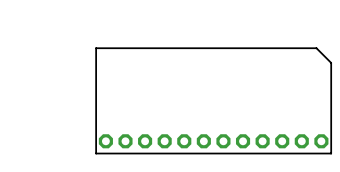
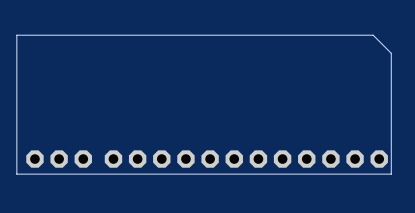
board edge: (331, 62) (316, 48) (96, 48) (96, 153) -> (391, 62) (391, 53) (373, 35) (16, 35) (16, 174) (101, 174)
part: none -> (34, 159)
part: none -> (59, 159)
part: none -> (83, 159)

